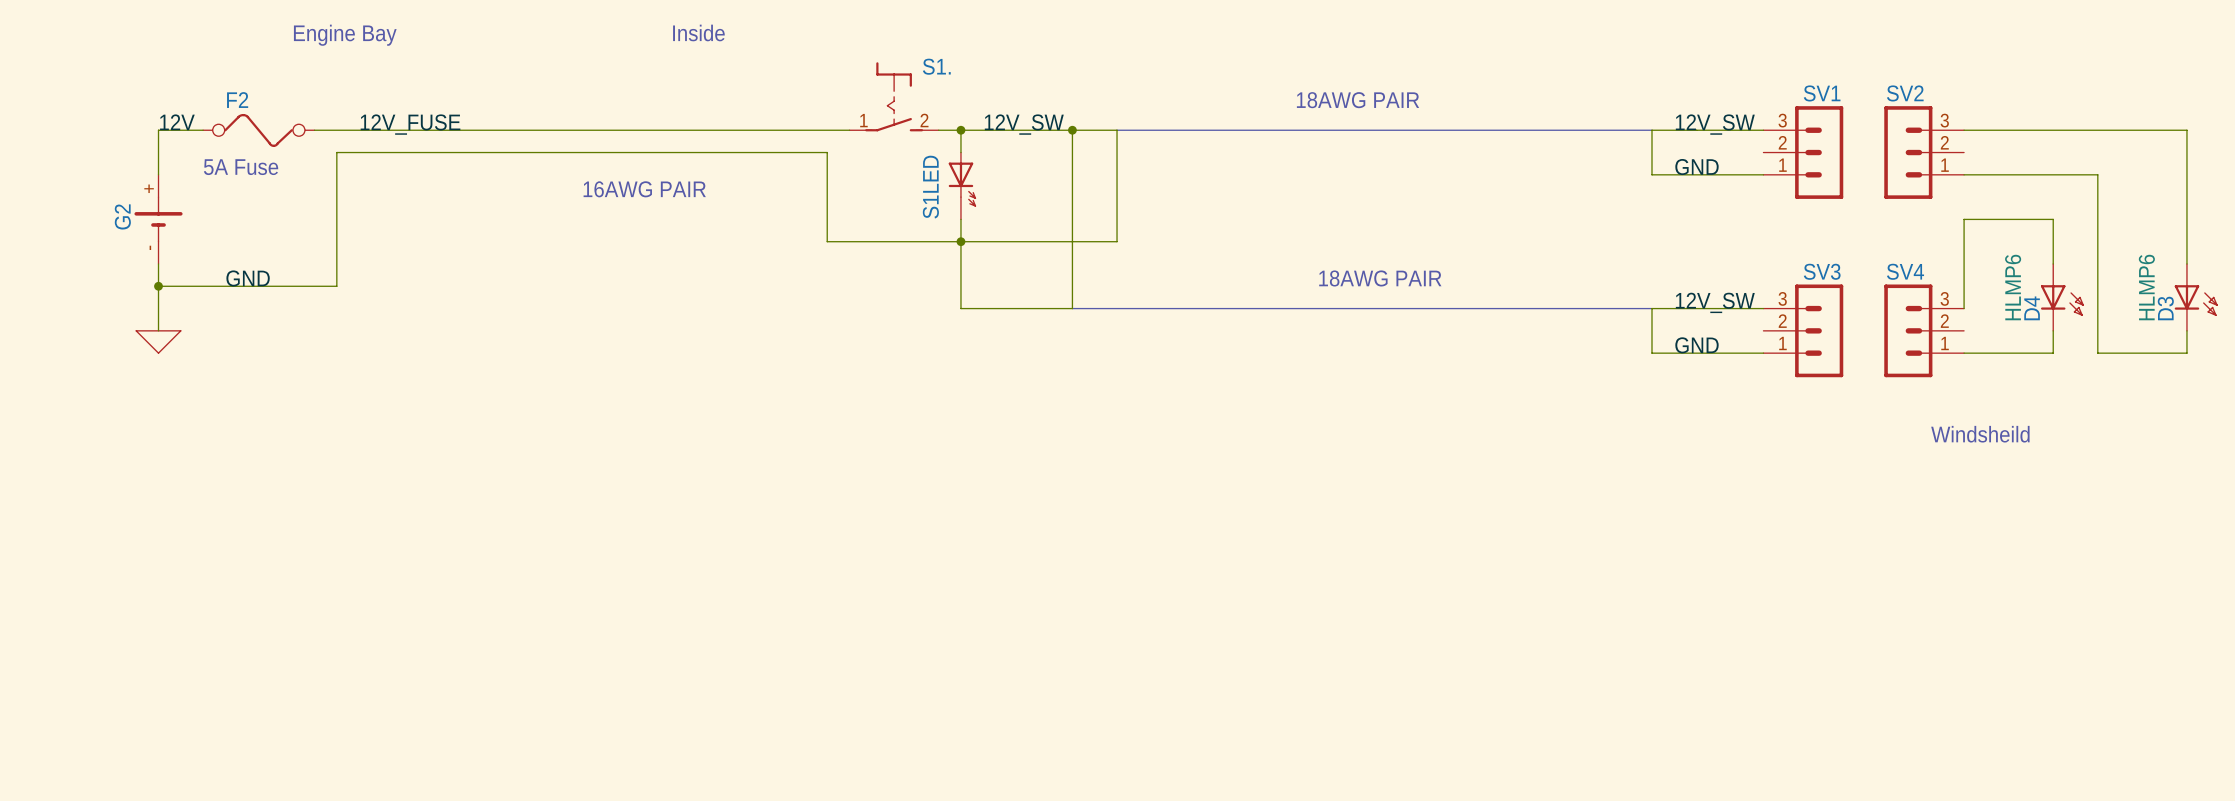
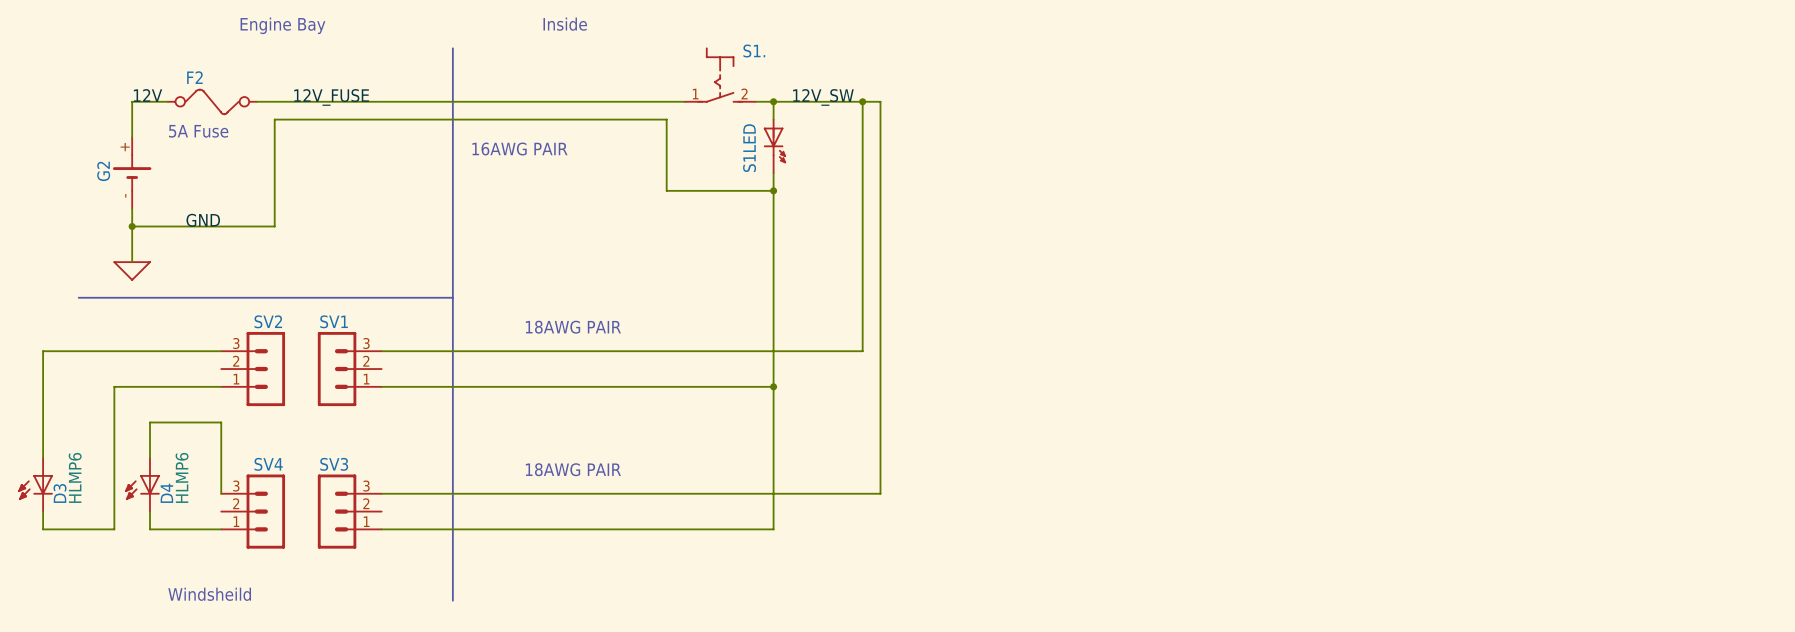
line: none -> (452, 48) (452, 600)
text: 18AWG PAIR (1358, 100) -> none
label: 12V_SW (1715, 124) -> none
wire: (1094, 130) (1117, 130) (1117, 241) (960, 241) -> (880, 101) (880, 493) (381, 493)
bus: (1117, 130) (1651, 130) -> none
wire: (1763, 130) (1651, 130) (1651, 174) (1763, 174) -> none
wire: (1964, 130) (2186, 130) (2186, 263) -> none
SV1 position: (1803, 152) -> (349, 369)
SV1 flip: as is (1819, 152) -> left-right (337, 369)
SV2 flip: as is (1908, 152) -> left-right (265, 369)
SV2 position: (1924, 152) -> (253, 369)
label: GND (1696, 167) -> none
wire: (1964, 174) (2097, 174) (2097, 353) (2186, 353) (2186, 330) -> none
wire: (2053, 263) (2053, 219) (1964, 219) (1964, 308) -> none
text: 18AWG PAIR (1380, 278) -> none
D4 flip: as is (2062, 289) -> left-right (142, 478)
D3 flip: as is (2196, 289) -> left-right (35, 478)
D4 position: (2062, 297) -> (142, 484)
D3 position: (2196, 297) -> (35, 484)
label: 12V_SW (1715, 302) -> none
wire: (960, 308) (1072, 308) -> (381, 351) (862, 351) (862, 244)
wire: none -> (773, 244) (773, 529) (381, 529)
bus: (1072, 308) (1651, 308) -> none
wire: (1763, 308) (1651, 308) (1651, 353) (1763, 353) -> none
SV3 position: (1803, 330) -> (349, 511)
SV3 flip: as is (1819, 330) -> left-right (337, 511)
SV4 flip: as is (1908, 330) -> left-right (265, 511)
SV4 position: (1924, 330) -> (253, 511)
wire: (2053, 330) (2053, 353) (1964, 353) -> none
label: GND (1696, 345) -> none
line: none -> (78, 297) (452, 297)
text: none -> 18AWG PAIR (573, 327)
text: Windsheild (1980, 434) -> none
wire: none -> (221, 351) (43, 351) (43, 458)
wire: none -> (221, 386) (114, 386) (114, 529) (43, 529) (43, 511)
wire: none -> (381, 386) (773, 386)
junction: none -> (773, 386)
wire: none -> (149, 458) (149, 422) (221, 422) (221, 493)
text: none -> 18AWG PAIR (573, 469)
wire: none -> (149, 511) (149, 529) (221, 529)
text: none -> Windsheild (209, 594)

